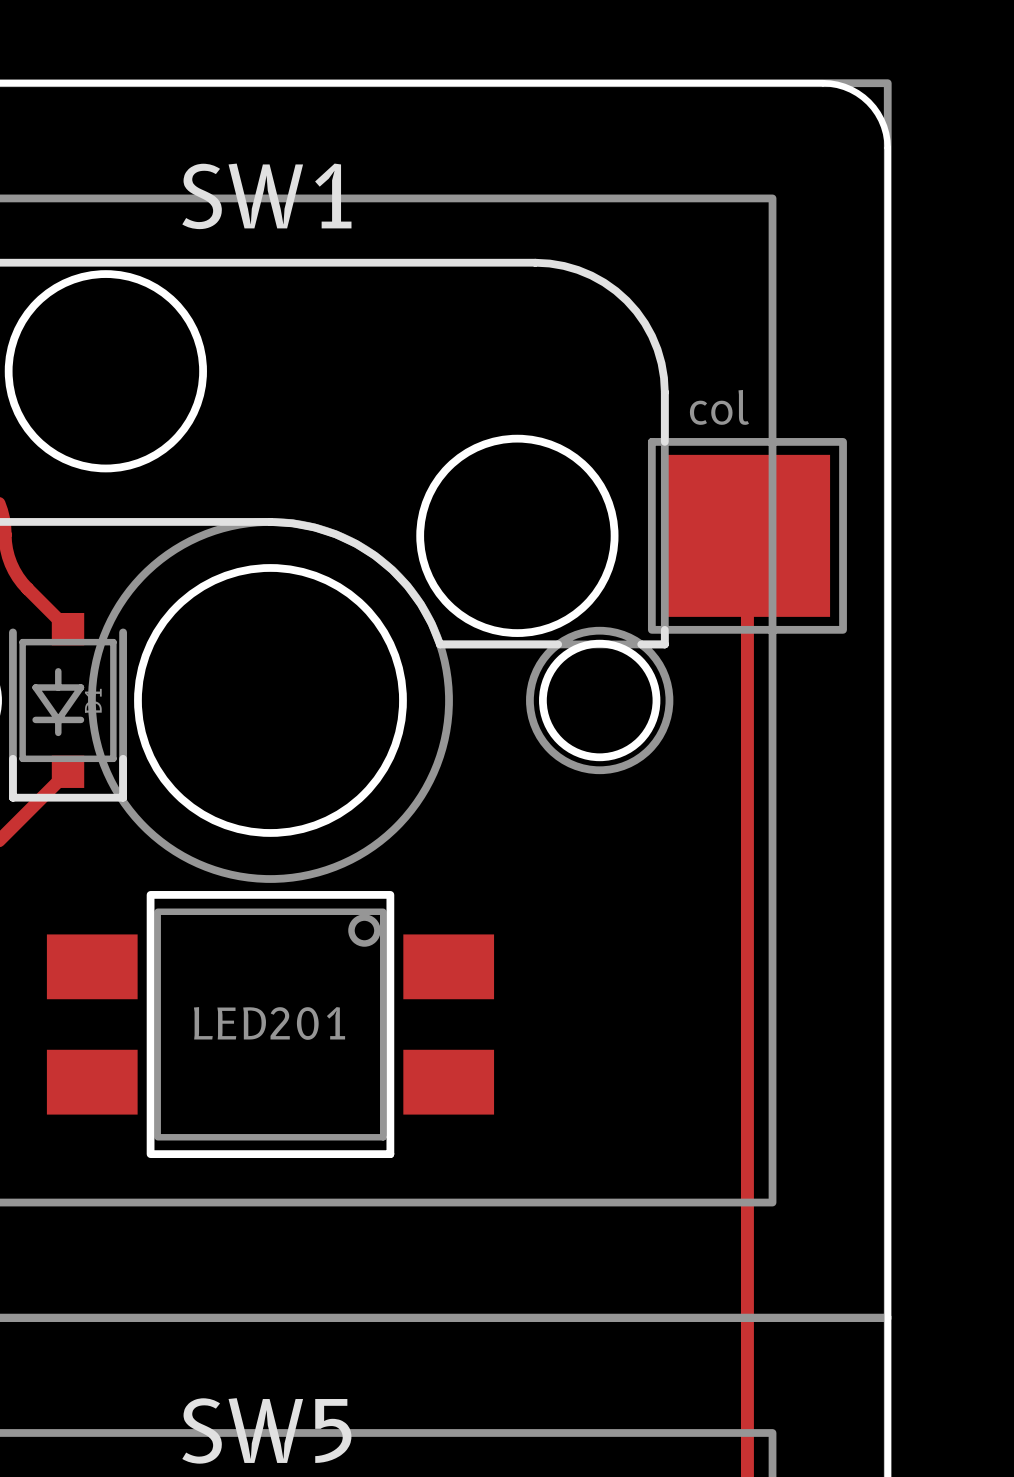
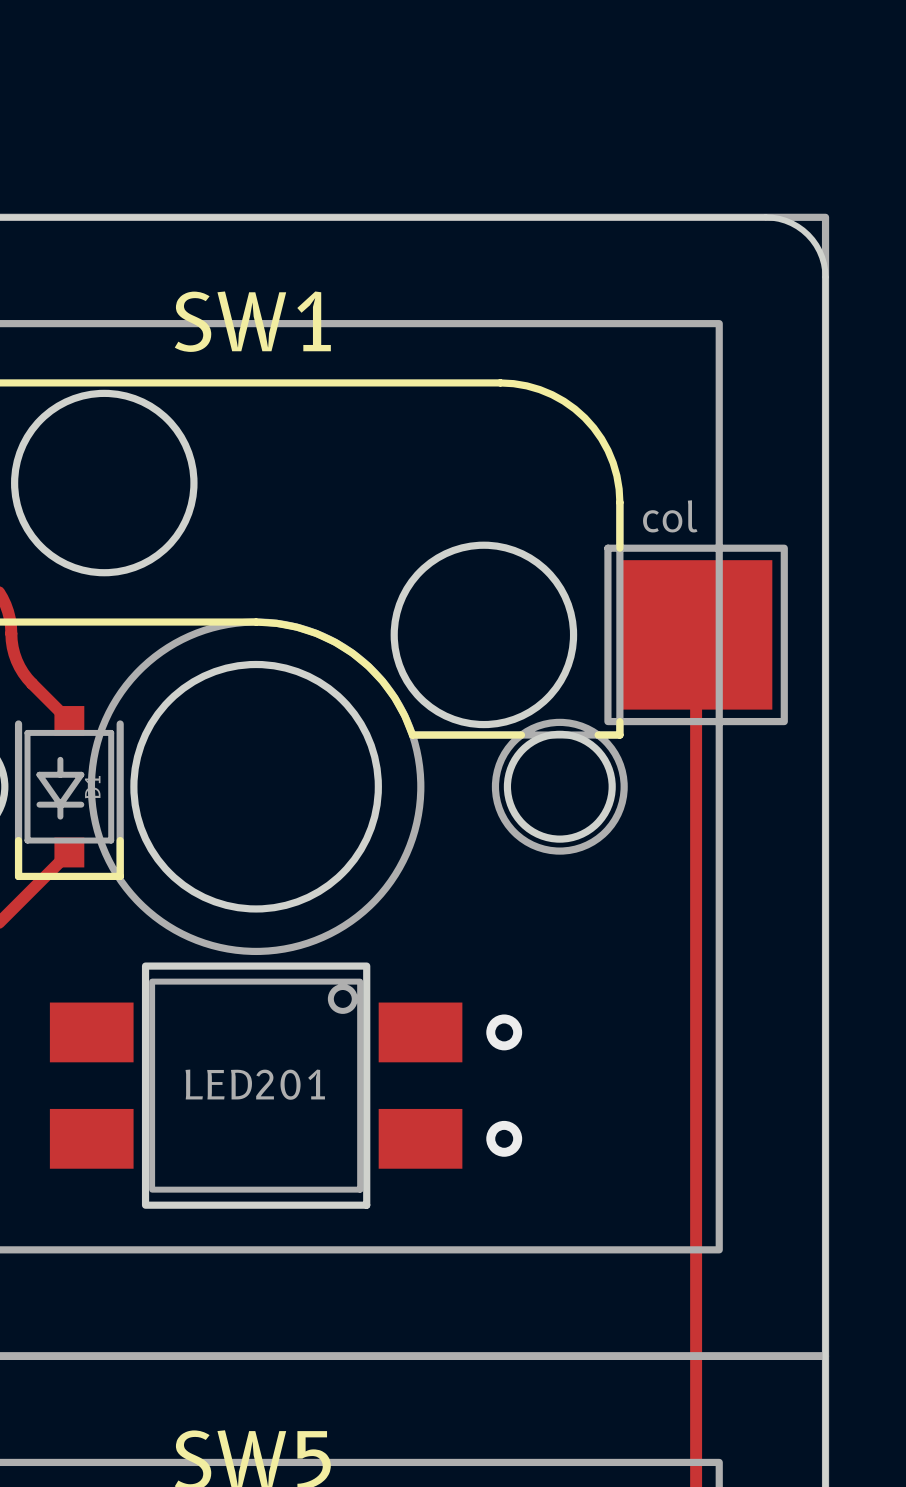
via: none -> (504, 1032)
via: none -> (504, 1138)

